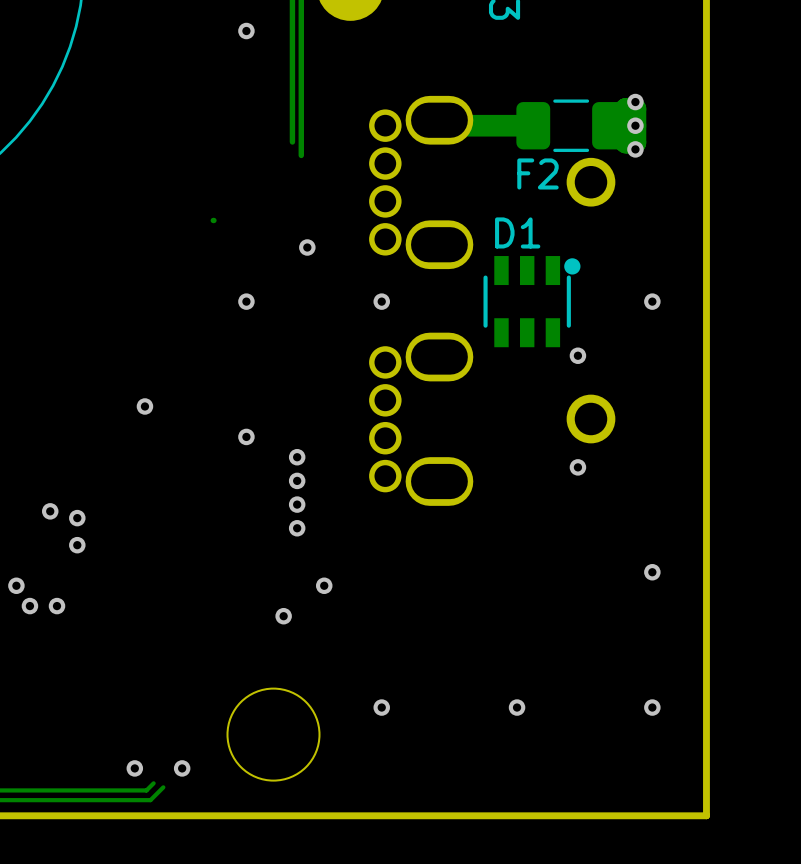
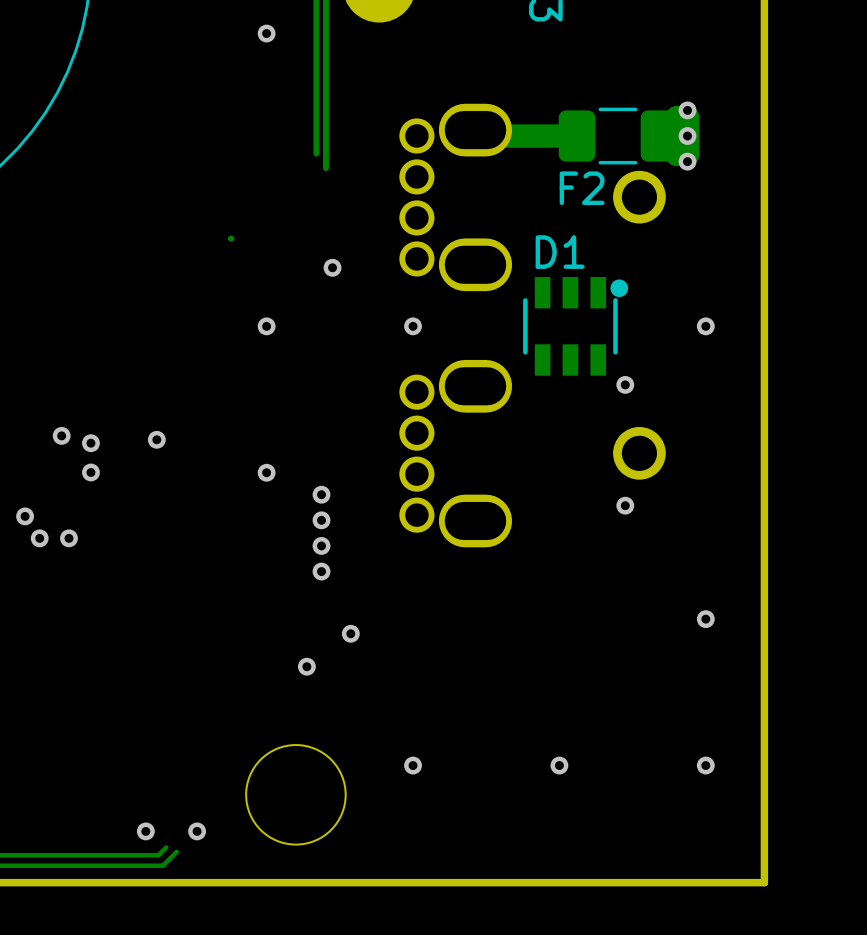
via: none -> (61, 435)
via: none -> (90, 443)
via: none -> (90, 472)
via: none -> (25, 516)
via: none -> (39, 538)
via: none -> (68, 538)
via: (50, 511) -> none
via: (77, 518) -> none
via: (77, 545) -> none
via: (16, 585) -> none
via: (29, 606) -> none
via: (57, 606) -> none

